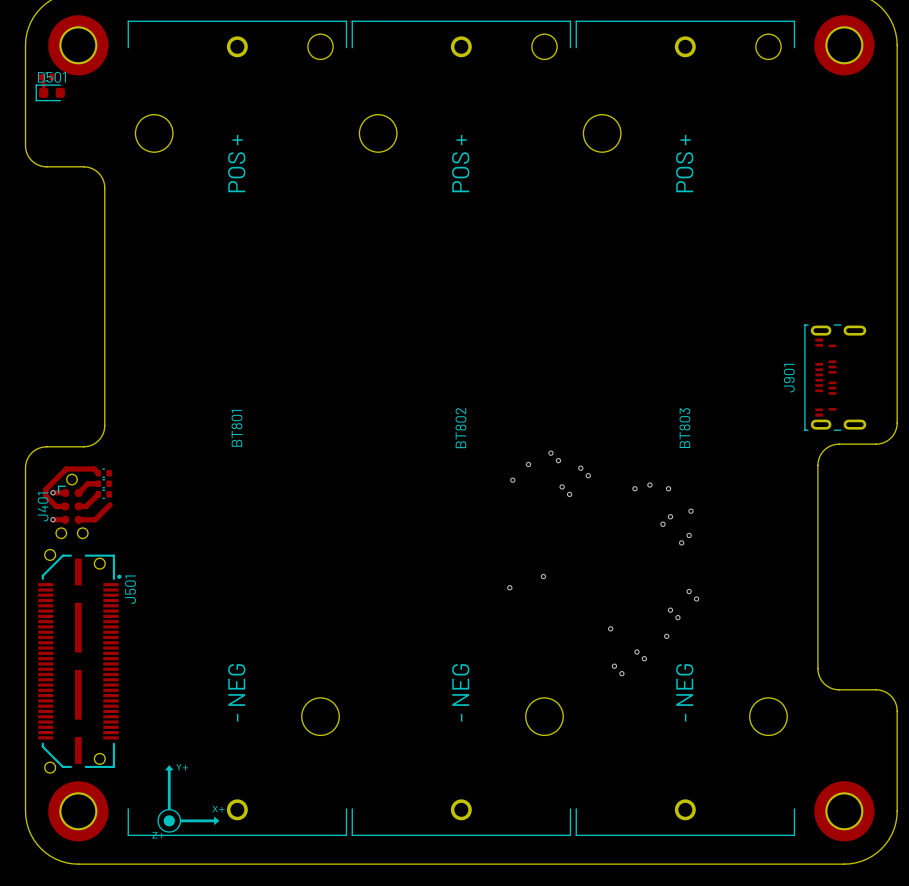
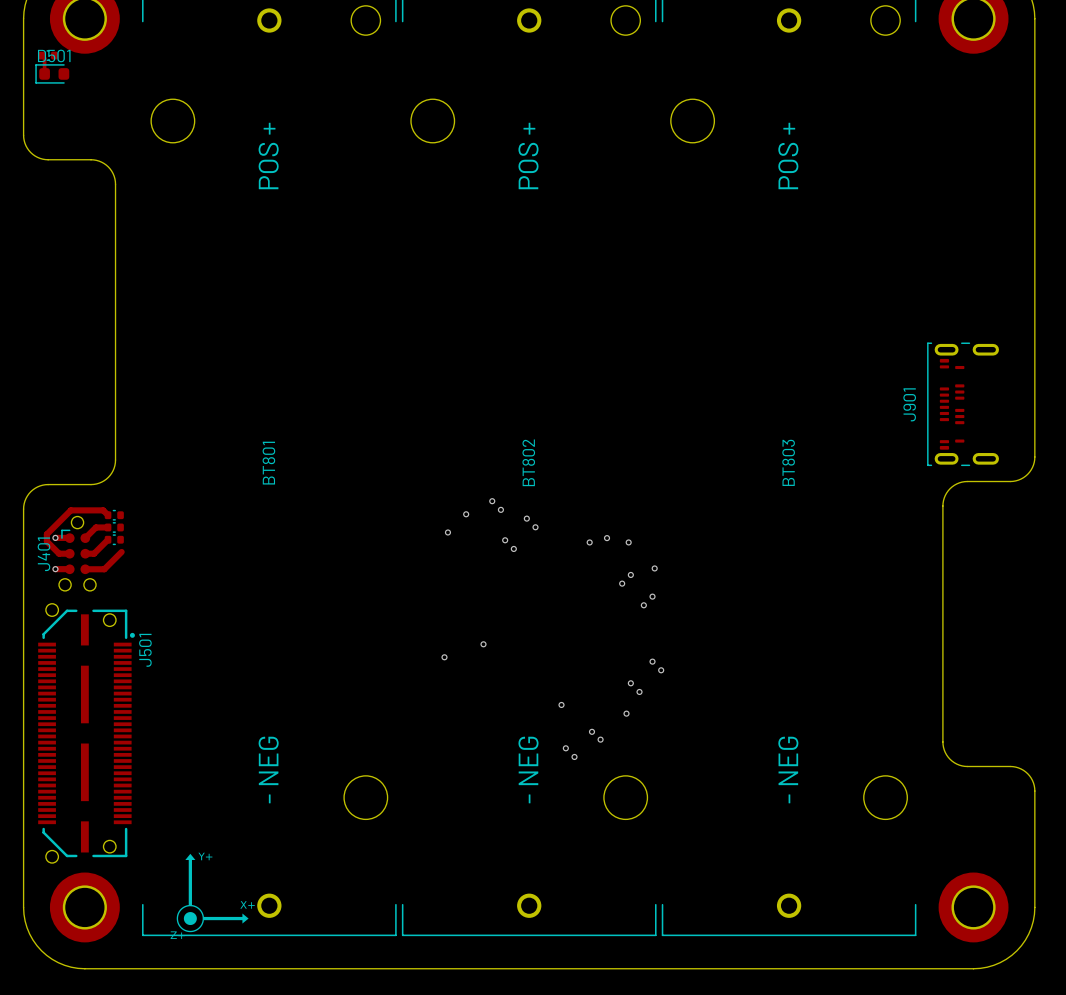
via: (550, 453) -> none
via: (558, 460) -> none
via: none -> (492, 501)
via: (528, 464) -> none
via: none -> (500, 509)
via: (580, 468) -> none
via: none -> (466, 514)
via: (588, 475) -> none
via: none -> (526, 518)
via: (512, 480) -> none
via: none -> (535, 527)
via: (649, 485) -> none
via: (562, 486) -> none
via: none -> (447, 532)
via: (634, 488) -> none
via: (668, 488) -> none
via: none -> (607, 538)
via: none -> (505, 540)
via: (569, 494) -> none
via: none -> (589, 542)
via: none -> (628, 542)
via: none -> (513, 548)
via: (690, 511) -> none
via: (670, 516) -> none
via: none -> (654, 568)
via: none -> (630, 574)
via: (662, 524) -> none
via: none -> (622, 583)
via: (689, 535) -> none
via: (681, 542) -> none
via: none -> (652, 596)
via: none -> (643, 605)
via: (543, 576) -> none
via: none -> (483, 644)
via: (509, 587) -> none
via: (689, 591) -> none
via: none -> (444, 657)
via: (696, 598) -> none
via: none -> (652, 661)
via: none -> (661, 670)
via: (670, 610) -> none
via: (677, 617) -> none
via: none -> (630, 683)
via: none -> (639, 691)
via: (610, 628) -> none
via: none -> (561, 704)
via: (666, 636) -> none
via: none -> (626, 713)
via: (636, 651) -> none
via: (644, 658) -> none
via: none -> (592, 731)
via: none -> (600, 739)
via: (614, 666) -> none
via: (621, 673) -> none
via: none -> (565, 748)
via: none -> (574, 756)

